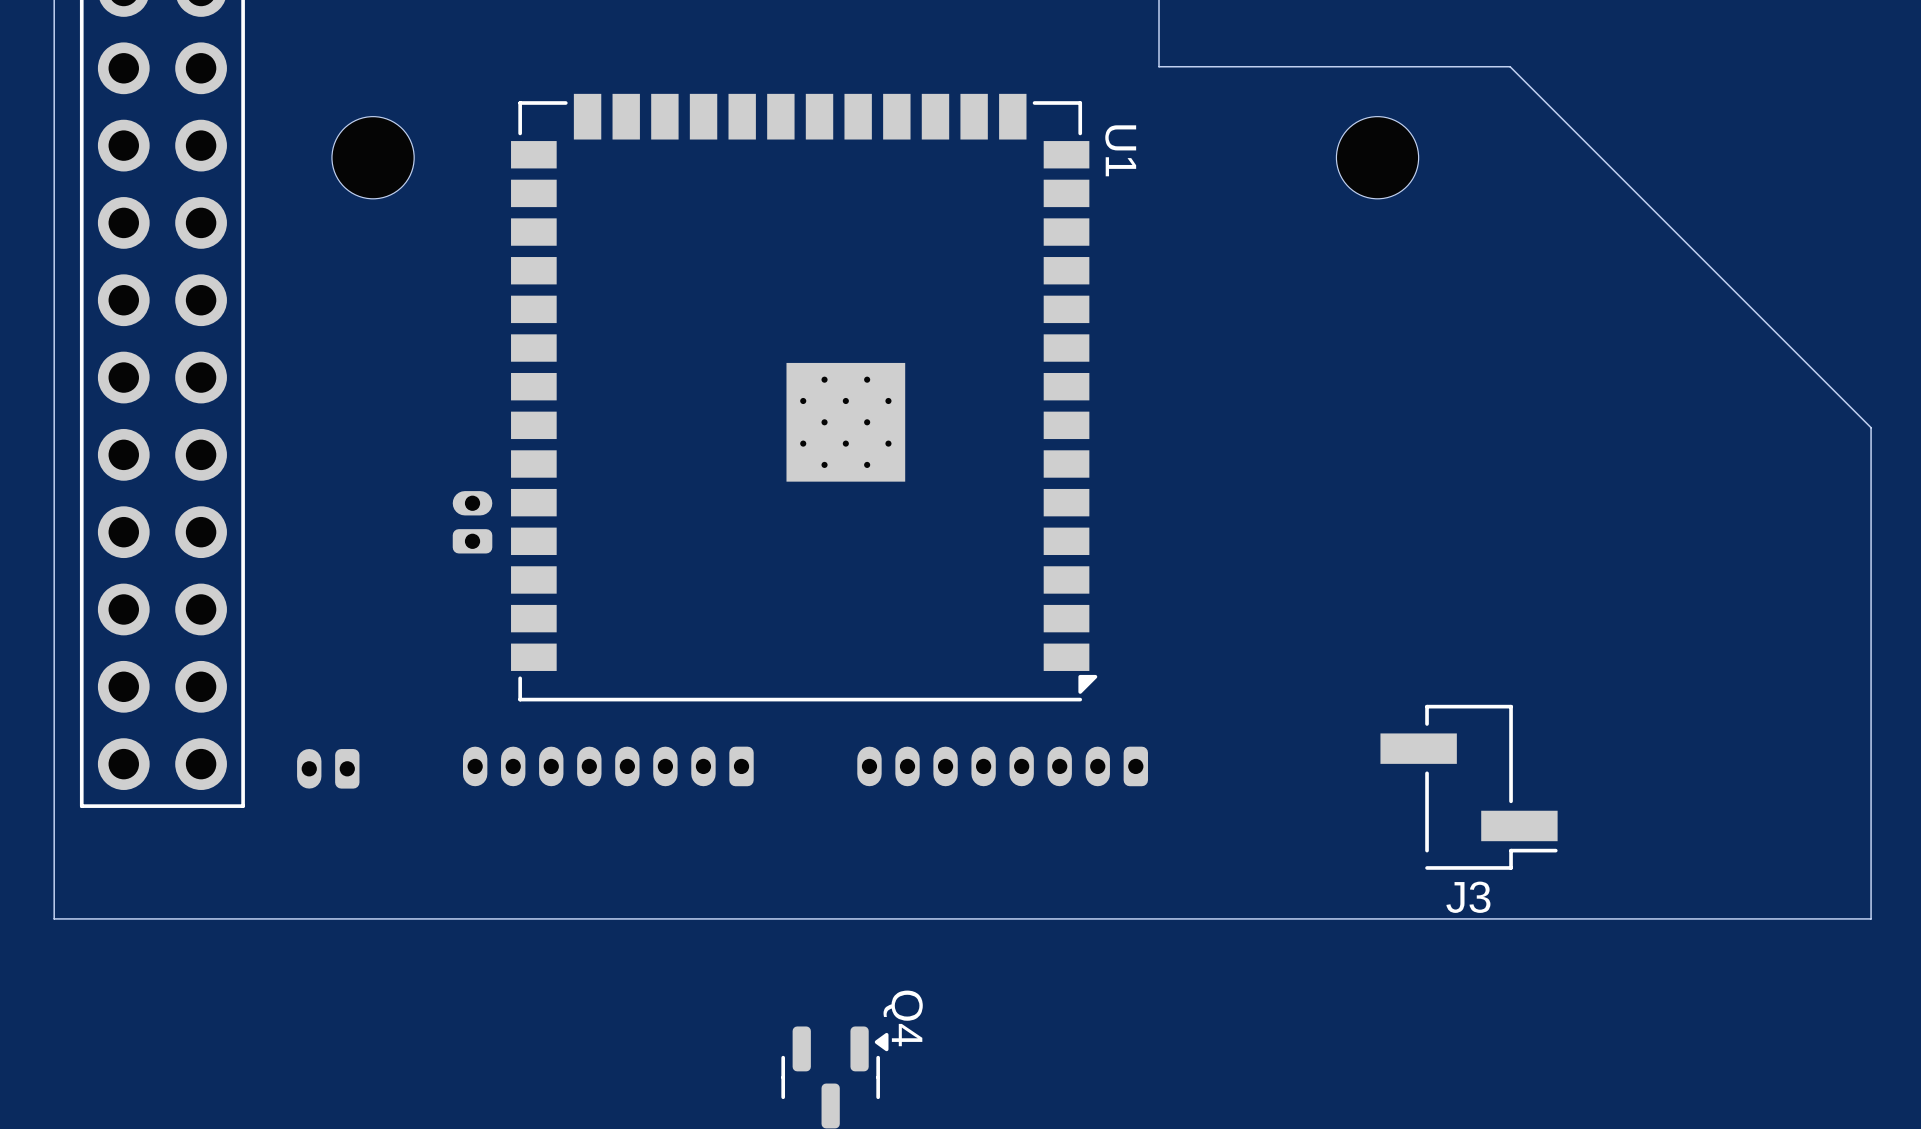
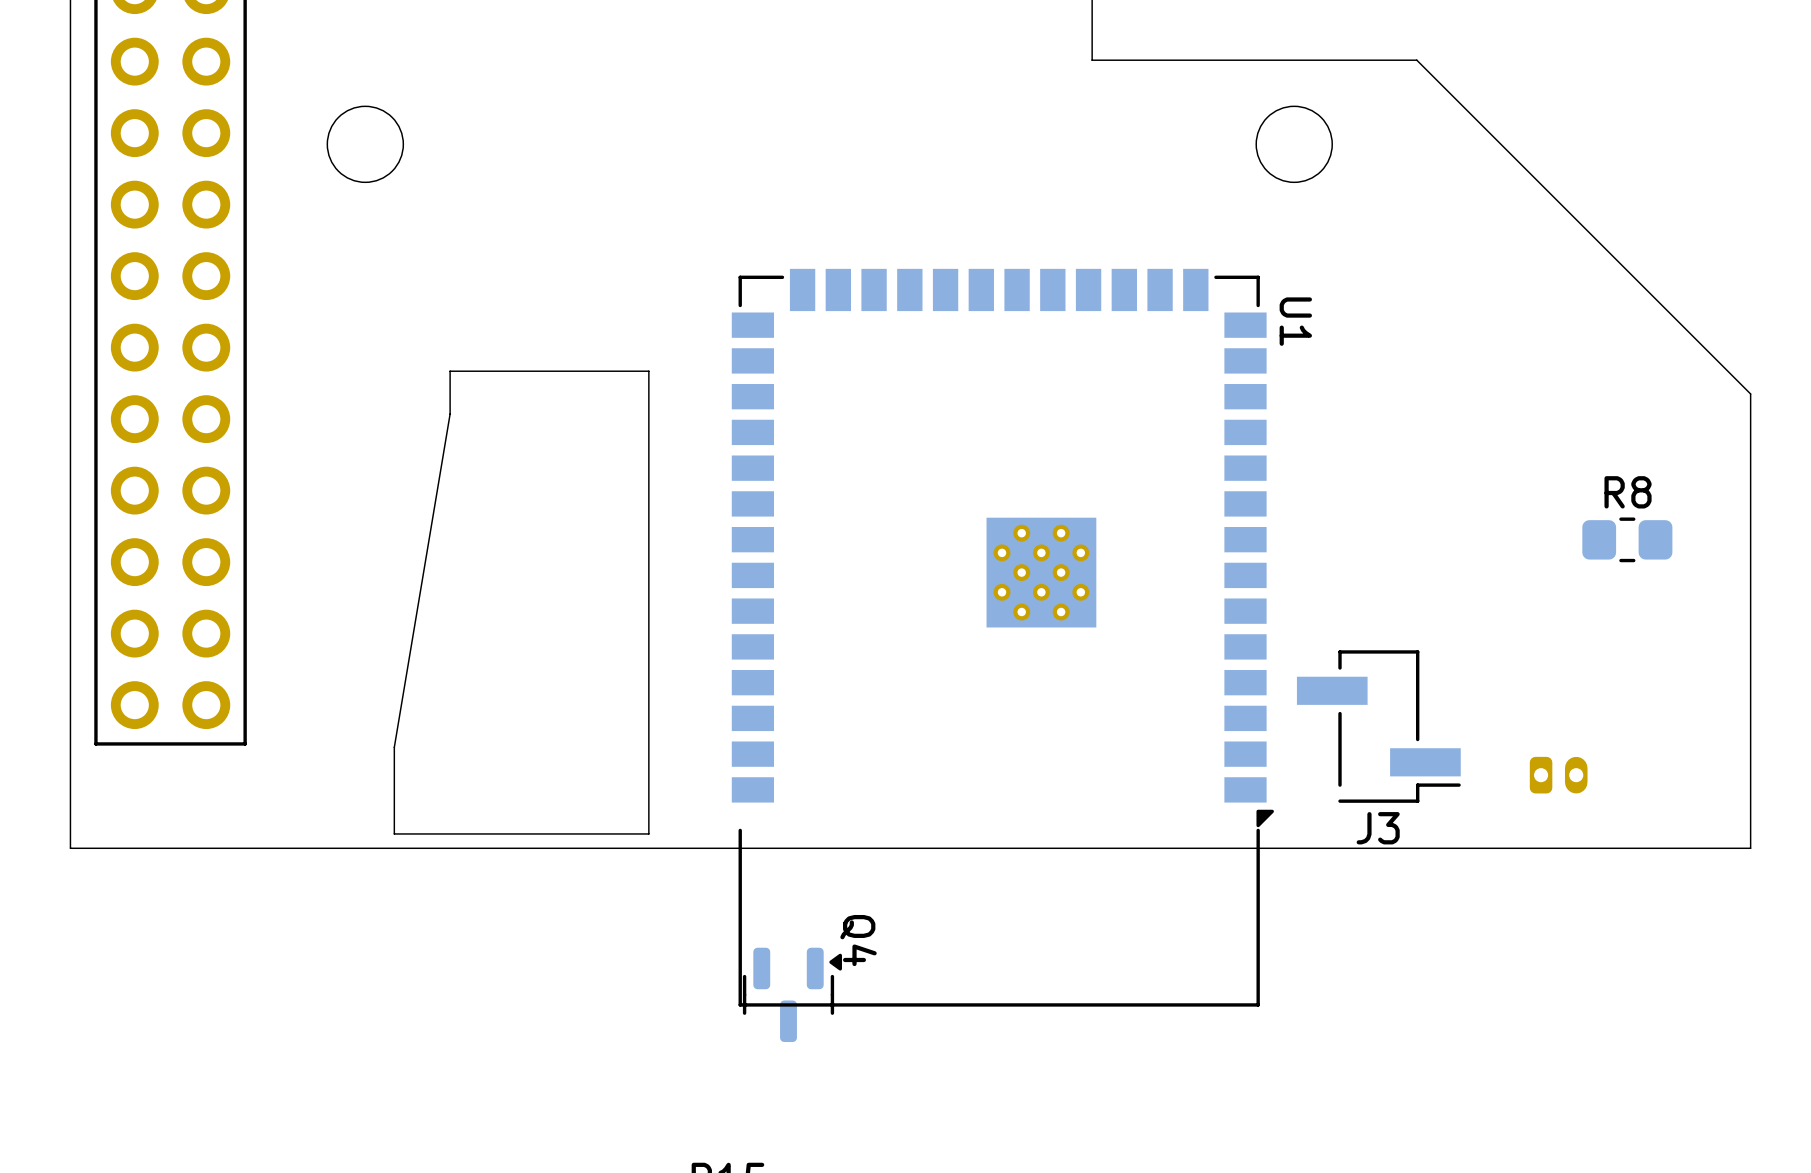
U1 footprint: [511, 93, 1098, 702] -> [731, 268, 1274, 1007]
U1 name position: U1 (1120, 150) -> U1 (1295, 321)
board edge: none -> (648, 371) (450, 371) (450, 414) (394, 747) (394, 833) (648, 833) (648, 371)
part: (472, 522) -> none
R8: none -> (1627, 539)
part: (608, 766) -> none
part: (1002, 766) -> none
part: (328, 768) -> none
part: none -> (1558, 775)

